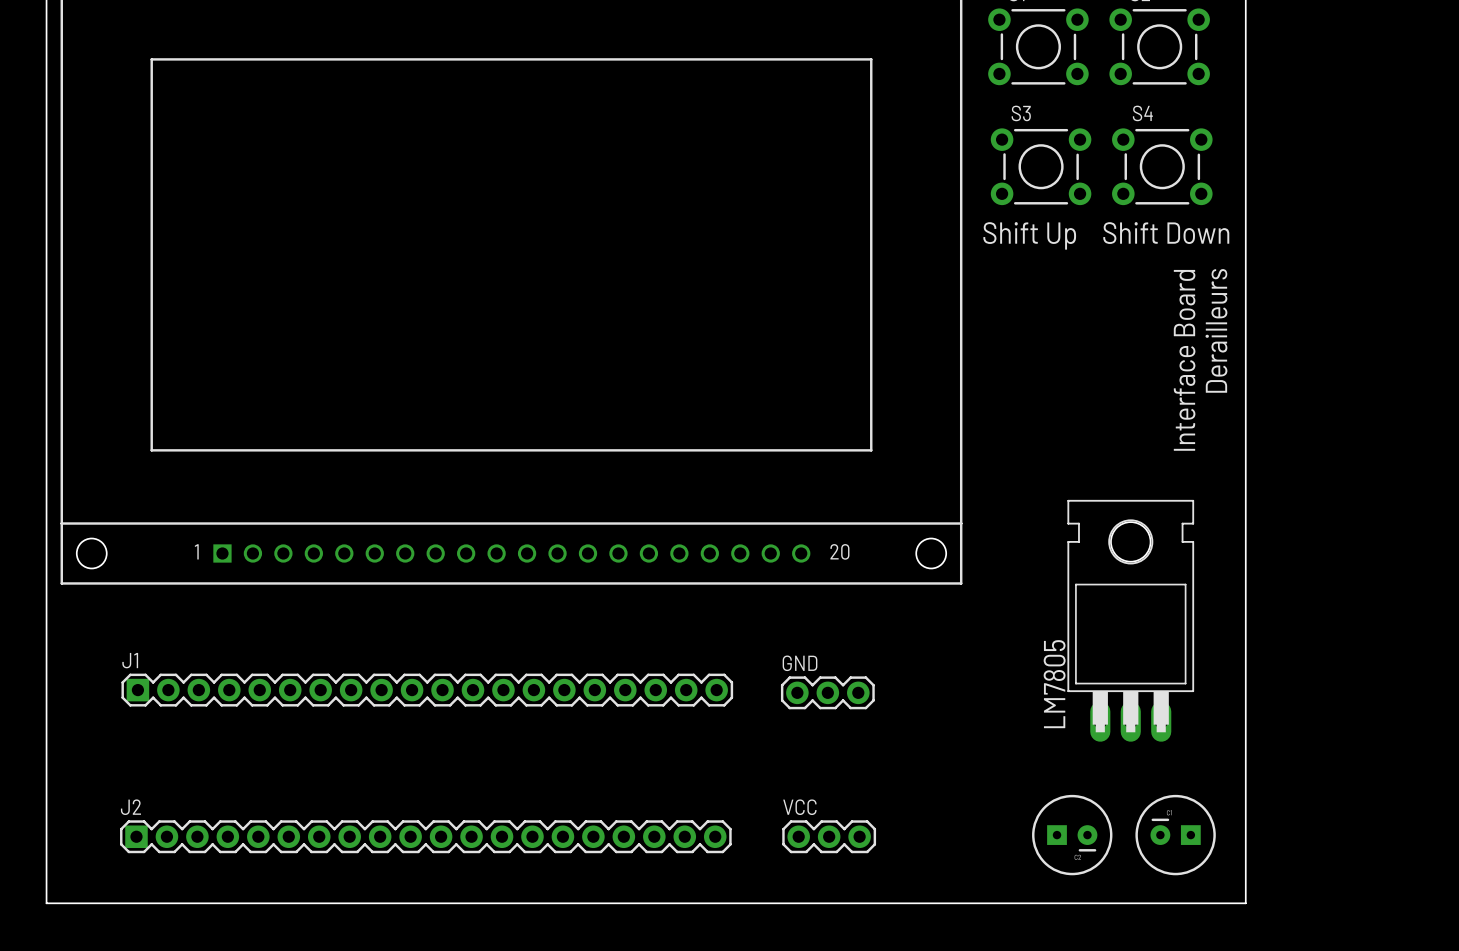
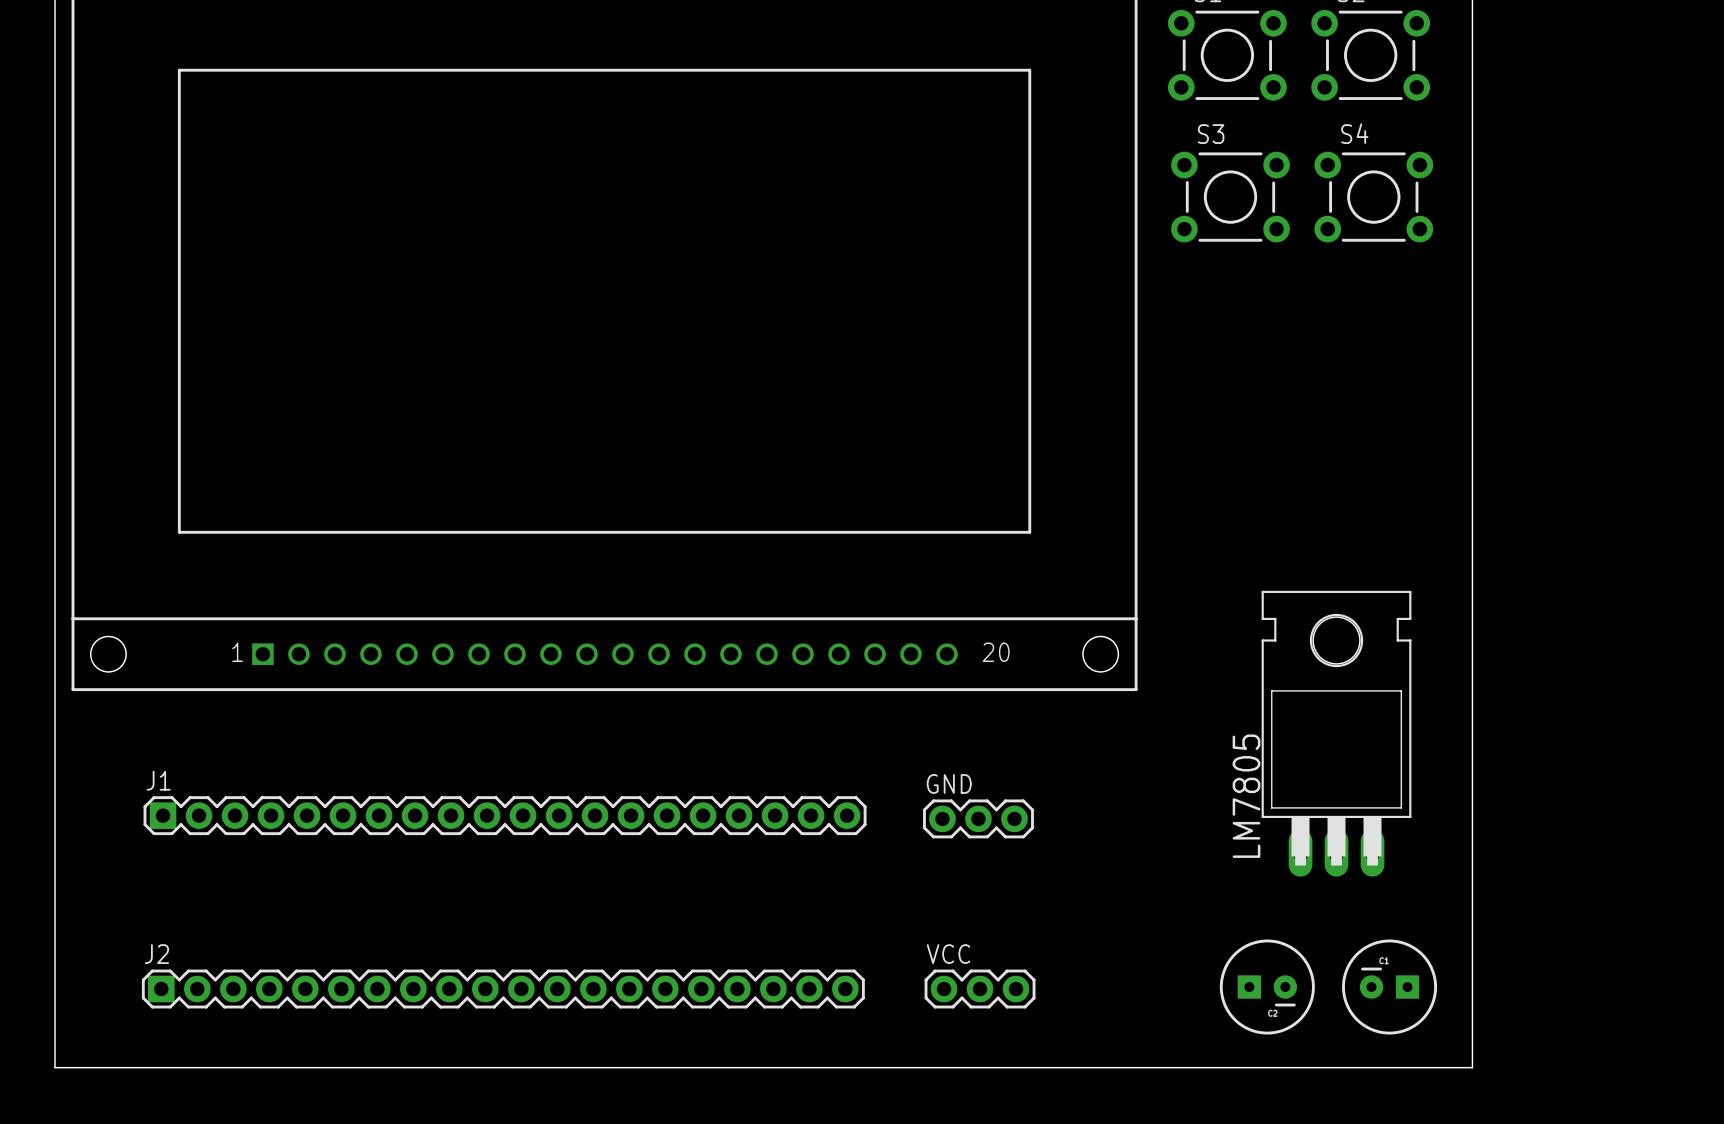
text: Shift Down (1166, 233) -> none
text: Shift Up (1029, 235) -> none
text: Derailleurs (1216, 330) -> none
text: Interface Board (1184, 360) -> none

